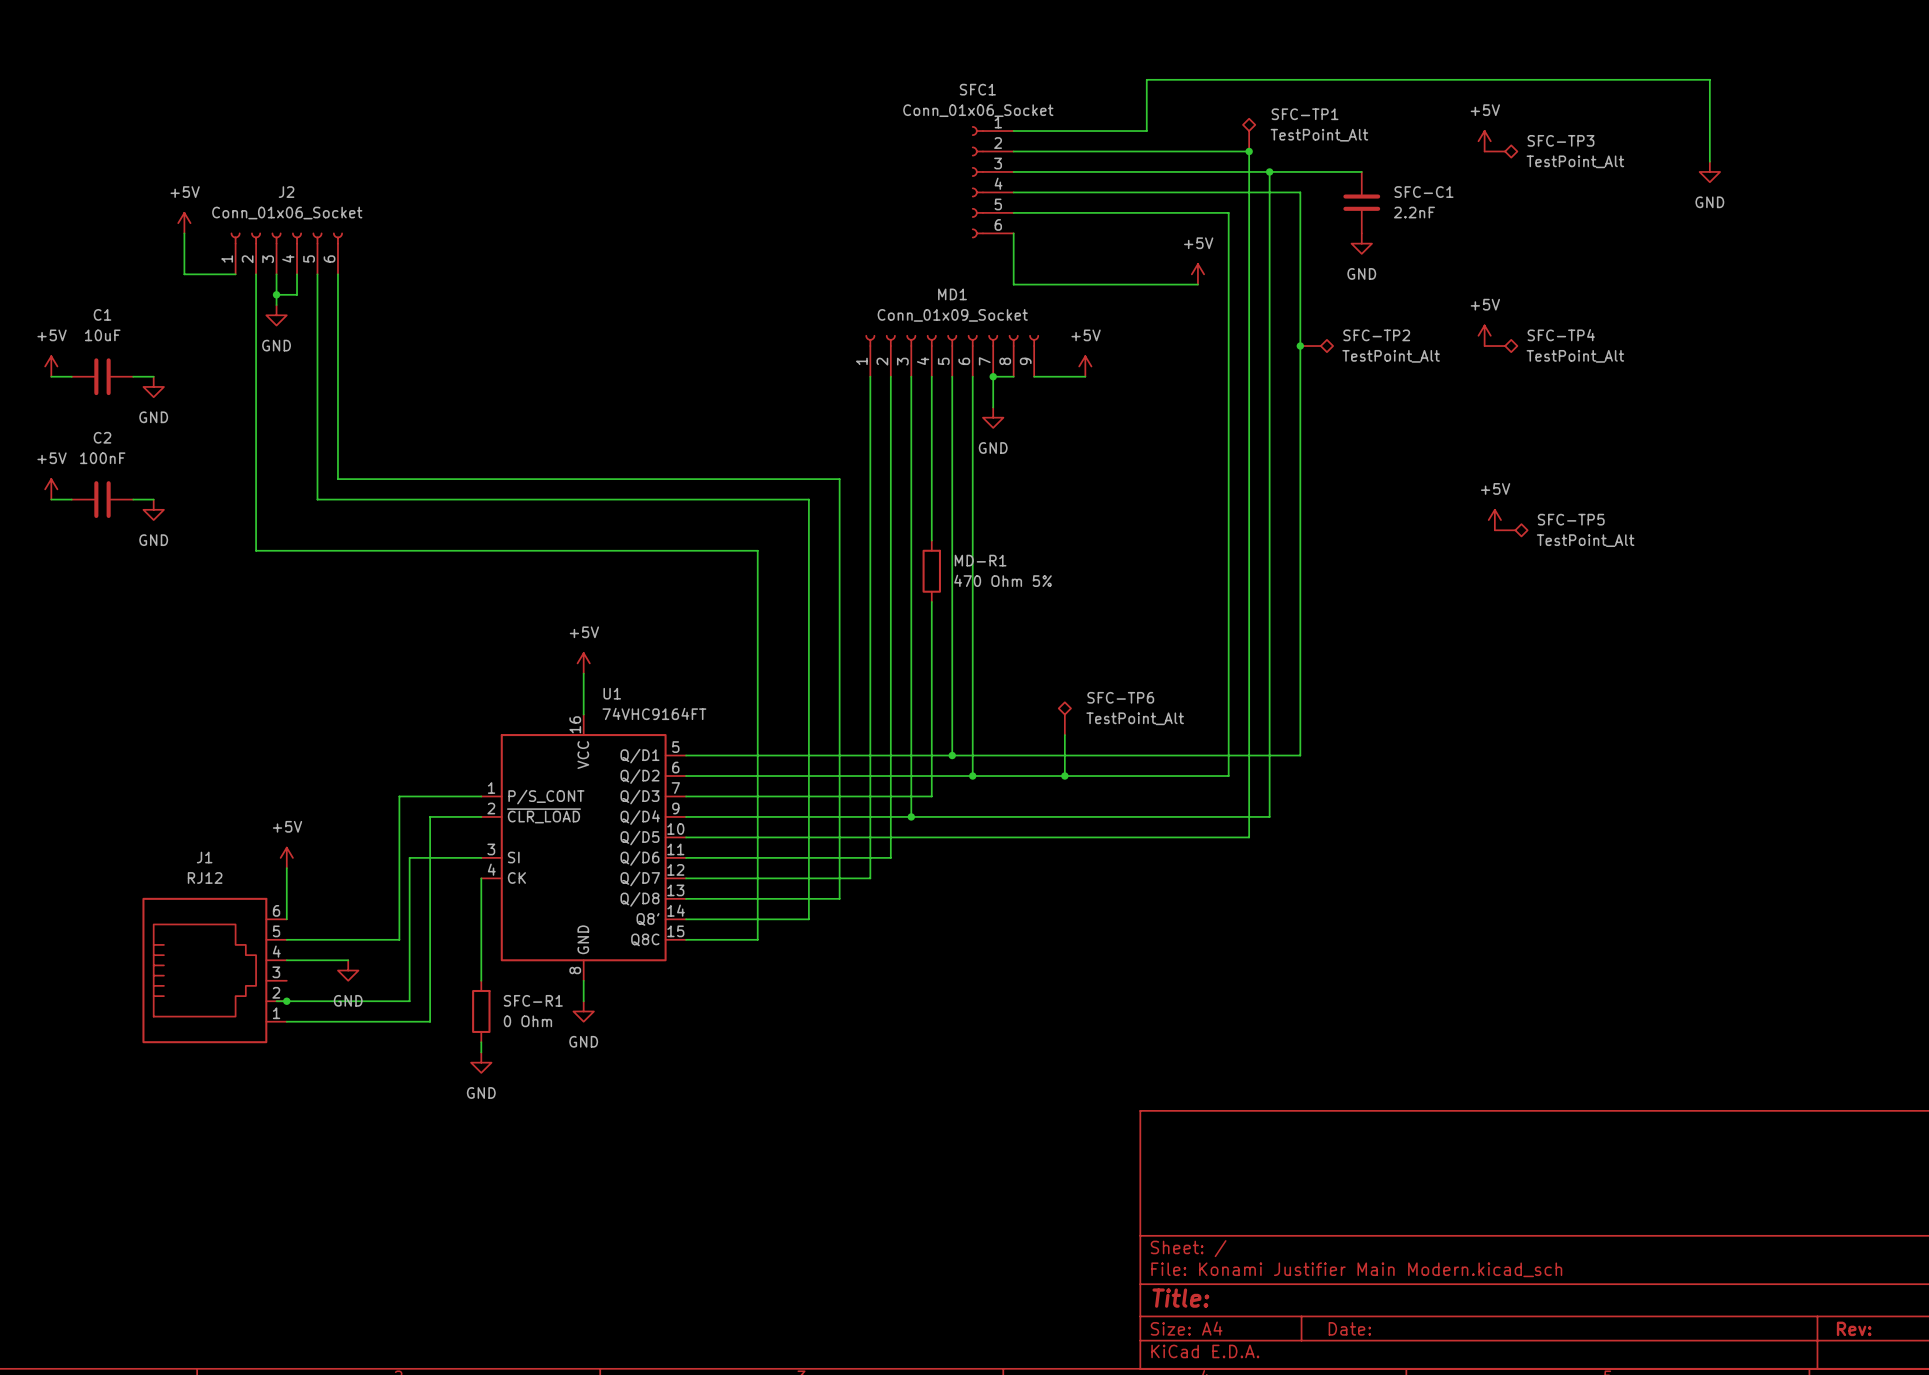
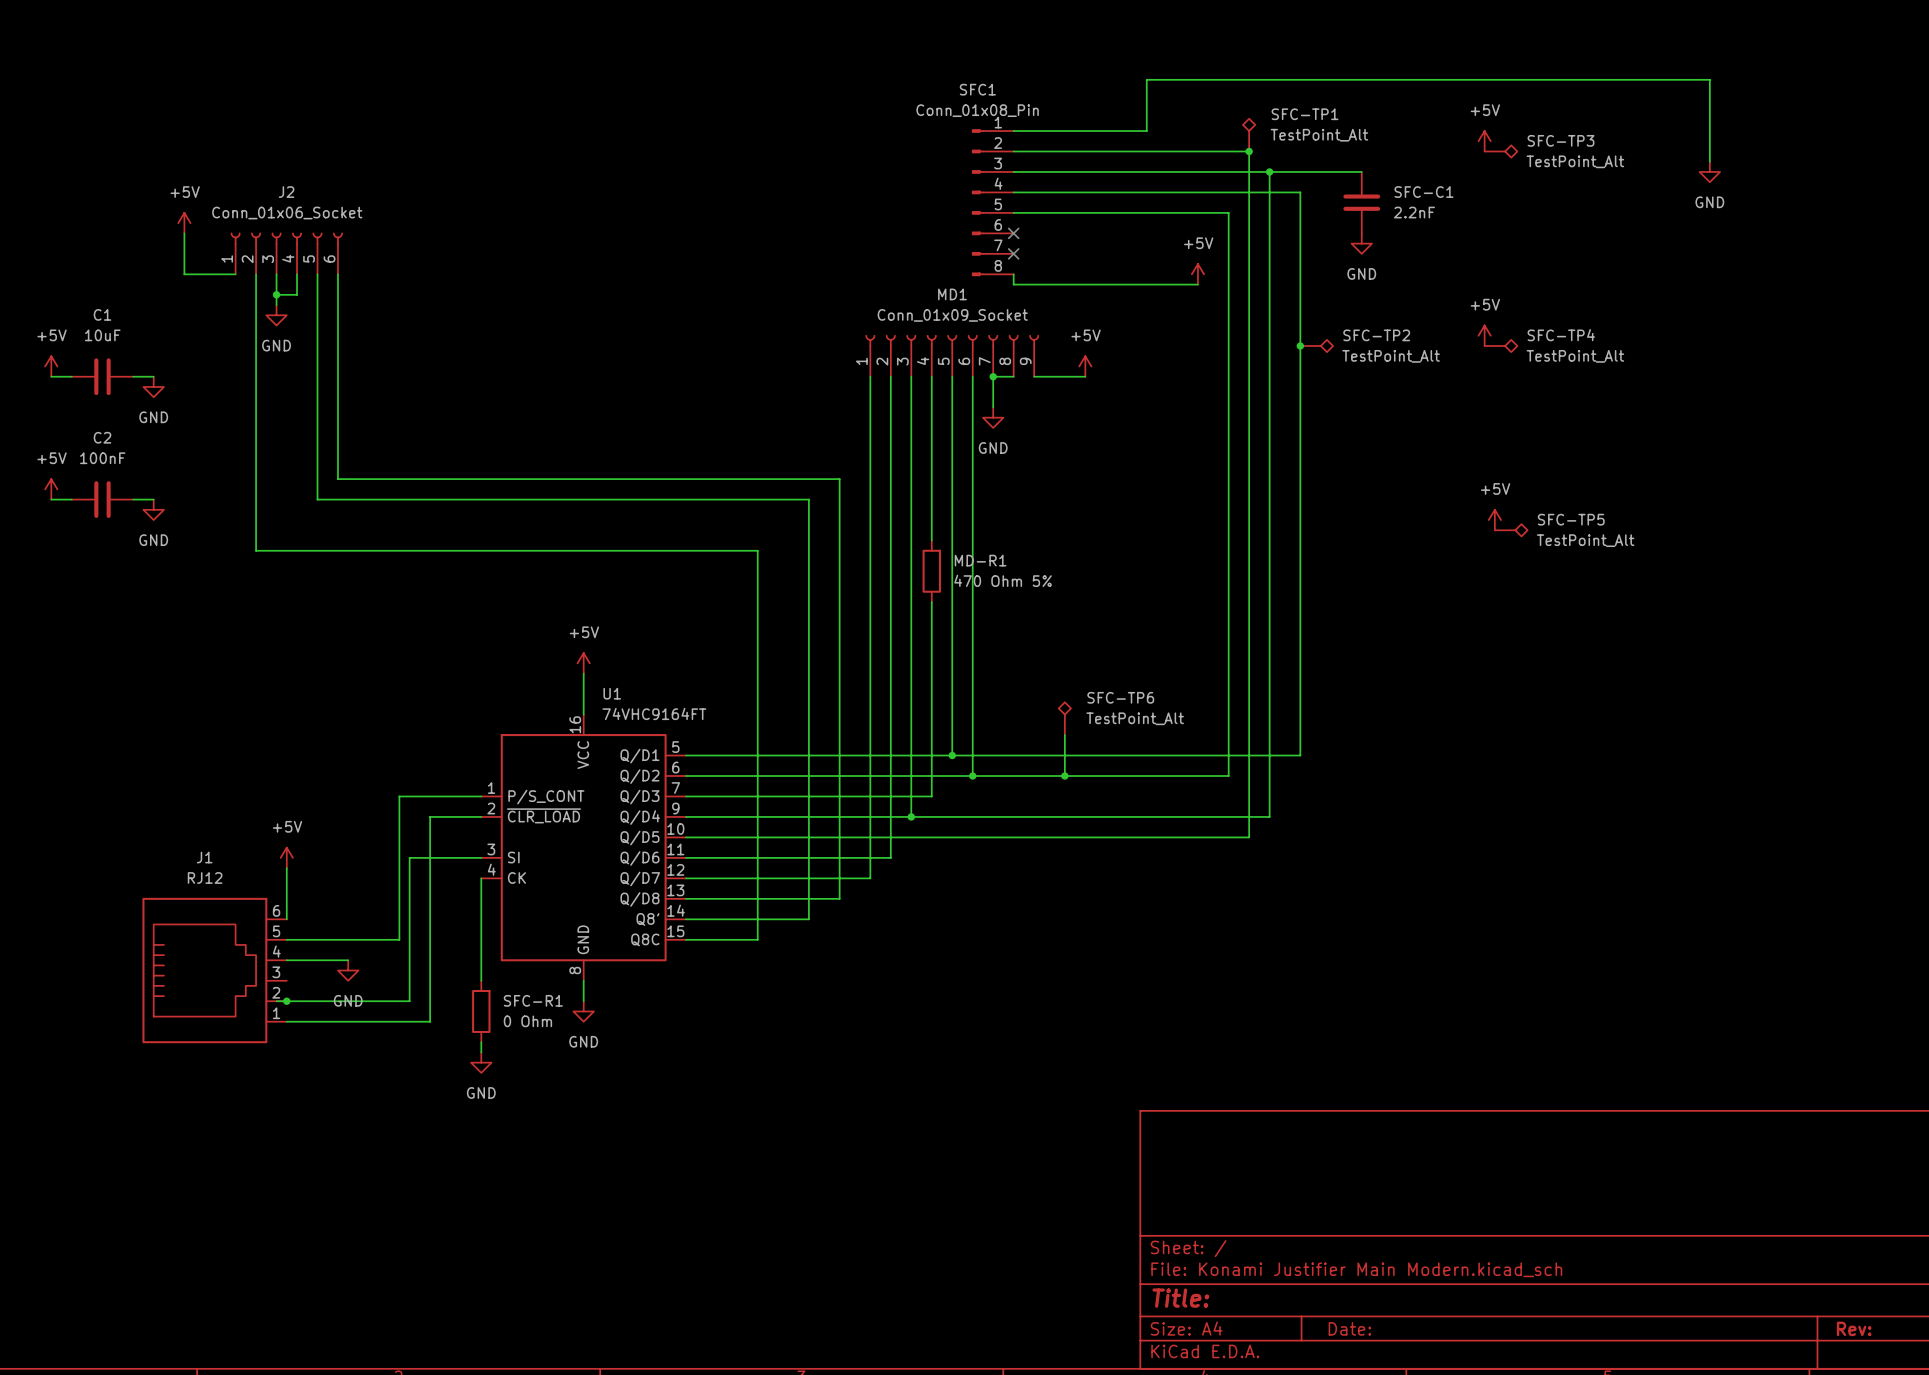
SFC1 value: Conn_01x06_Socket (978, 110) -> Conn_01x08_Pin (977, 110)
SFC1 symbol: [972, 126, 1014, 239] -> [972, 129, 1014, 276]
wire: (1013, 233) (1013, 274) -> none
no-connect mark: none -> (1013, 233)
no-connect mark: none -> (1013, 253)

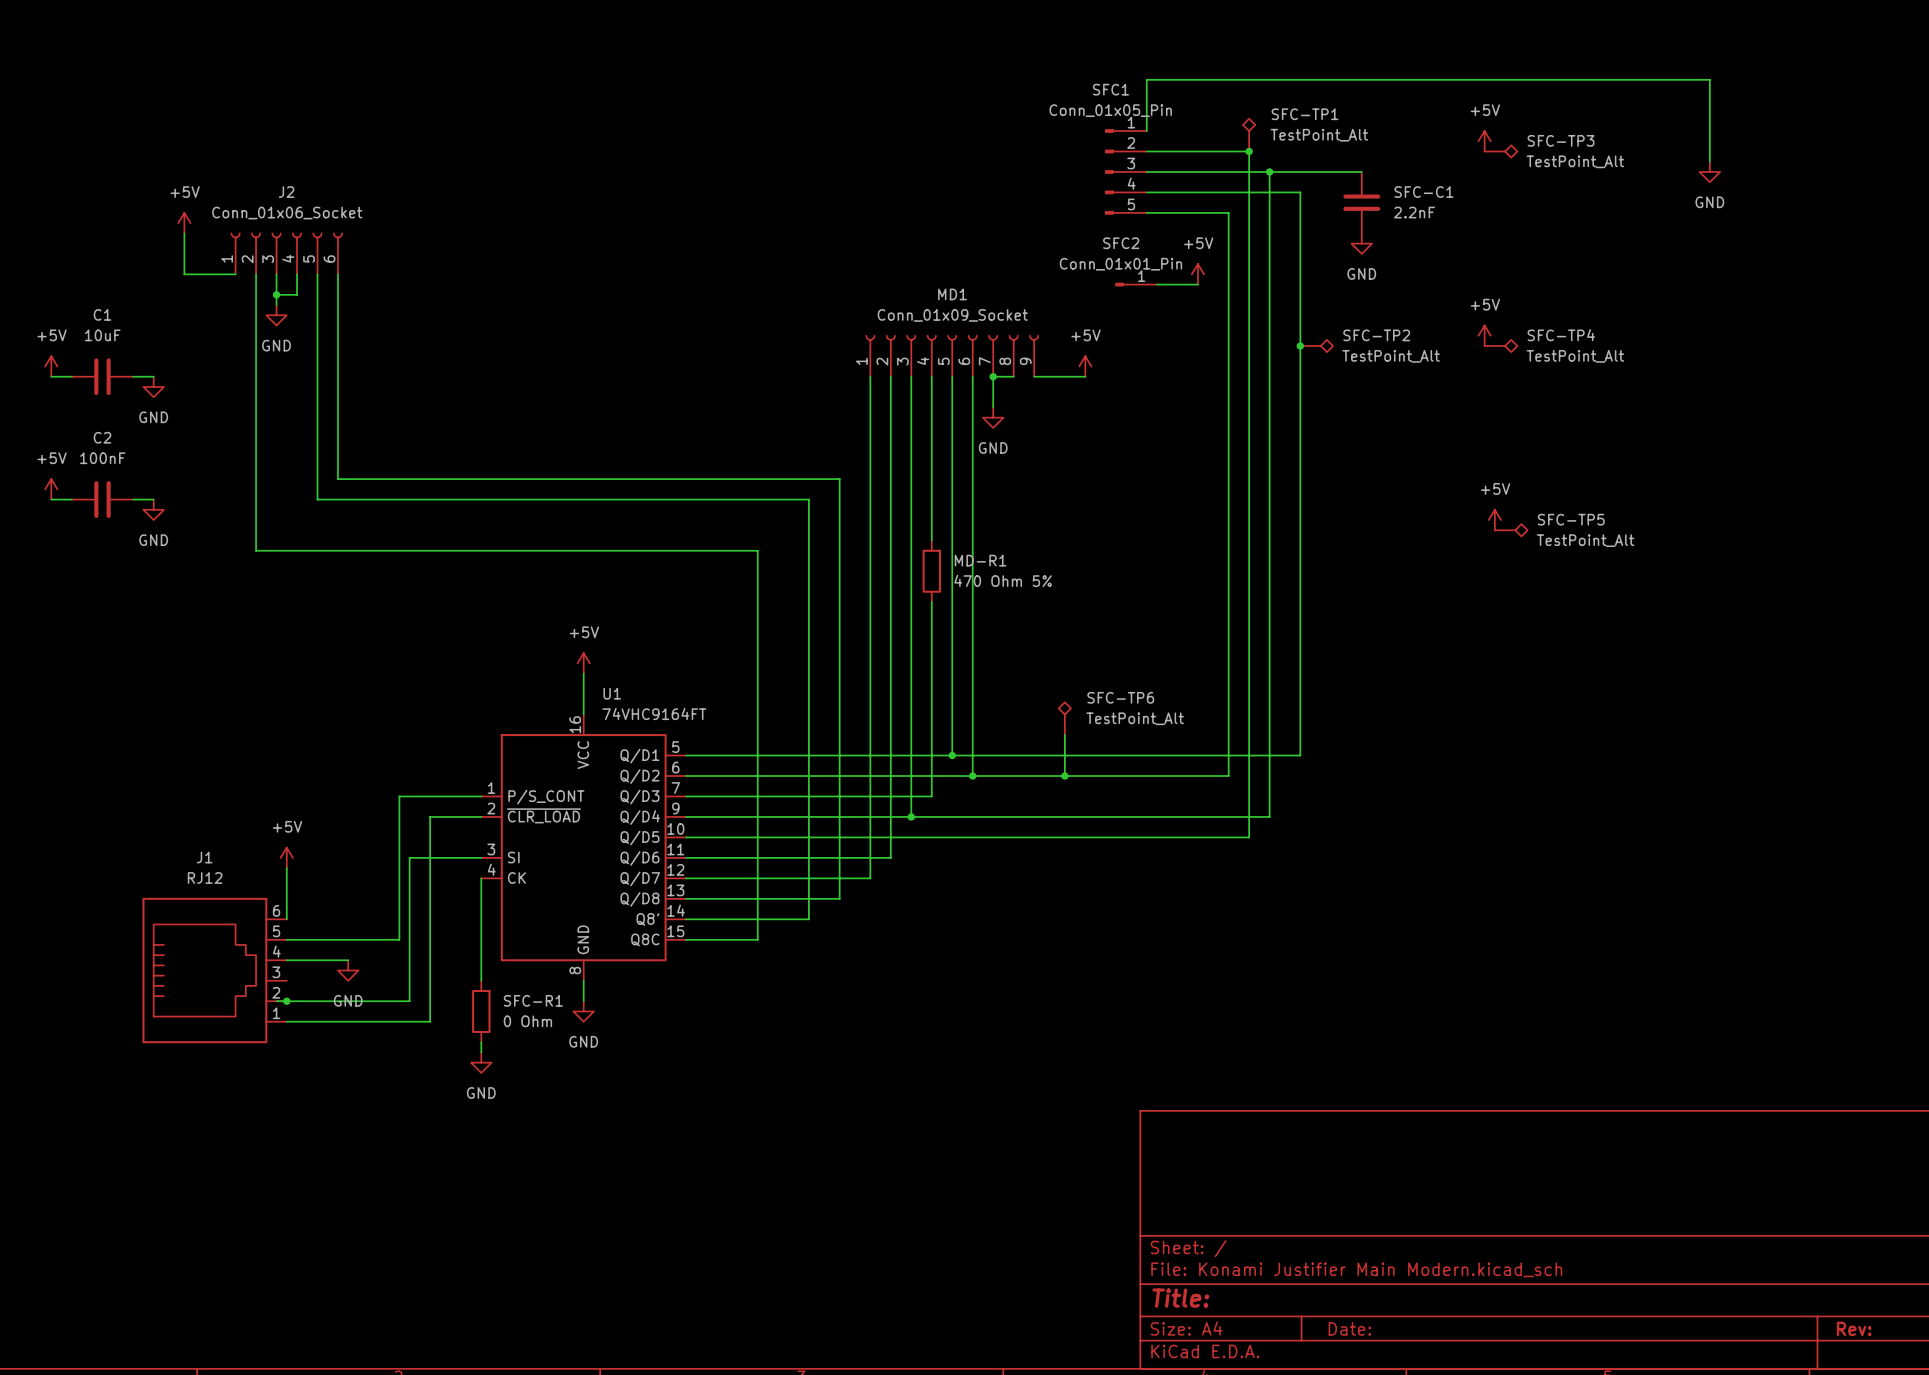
SFC1 name position: SFC1 (977, 89) -> SFC1 (1110, 89)
SFC1 value: Conn_01x08_Pin (977, 110) -> Conn_01x05_Pin (1110, 110)
SFC1 symbol: [972, 129, 1014, 276] -> [1105, 129, 1147, 215]
wire: (1013, 131) (1146, 131) -> none
wire: (1013, 151) (1146, 151) -> none
wire: (1013, 171) (1146, 171) -> none
wire: (1013, 192) (1146, 192) -> none
wire: (1013, 212) (1146, 212) -> none
no-connect mark: (1013, 233) -> none
no-connect mark: (1013, 253) -> none
wire: (1013, 274) (1013, 284) (1157, 284) -> none
SFC2: none -> Conn_01x01_Pin (1136, 284)

